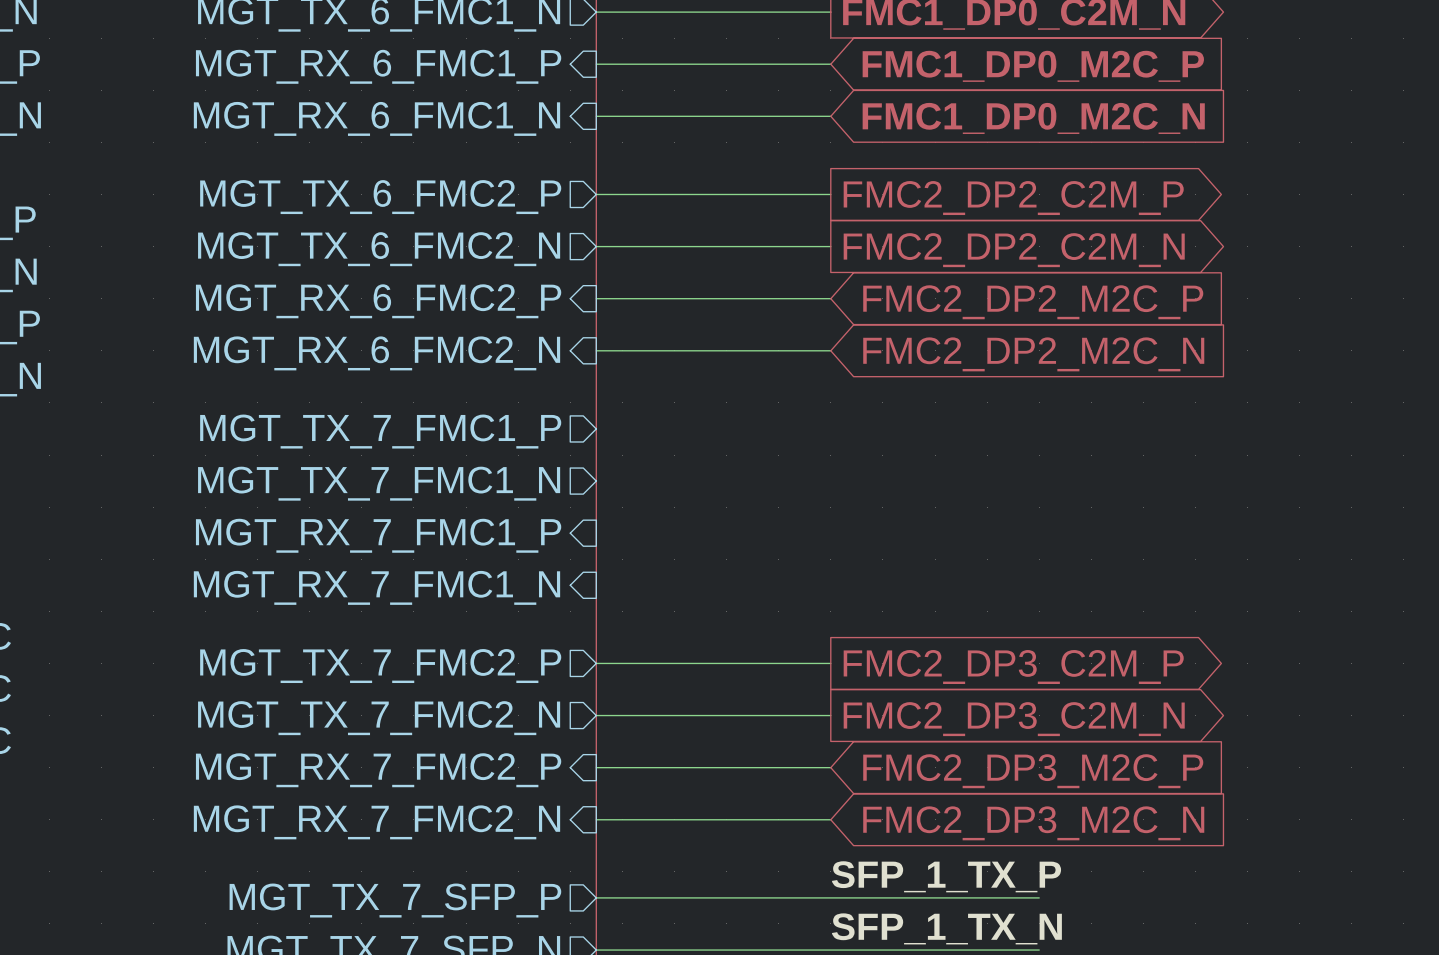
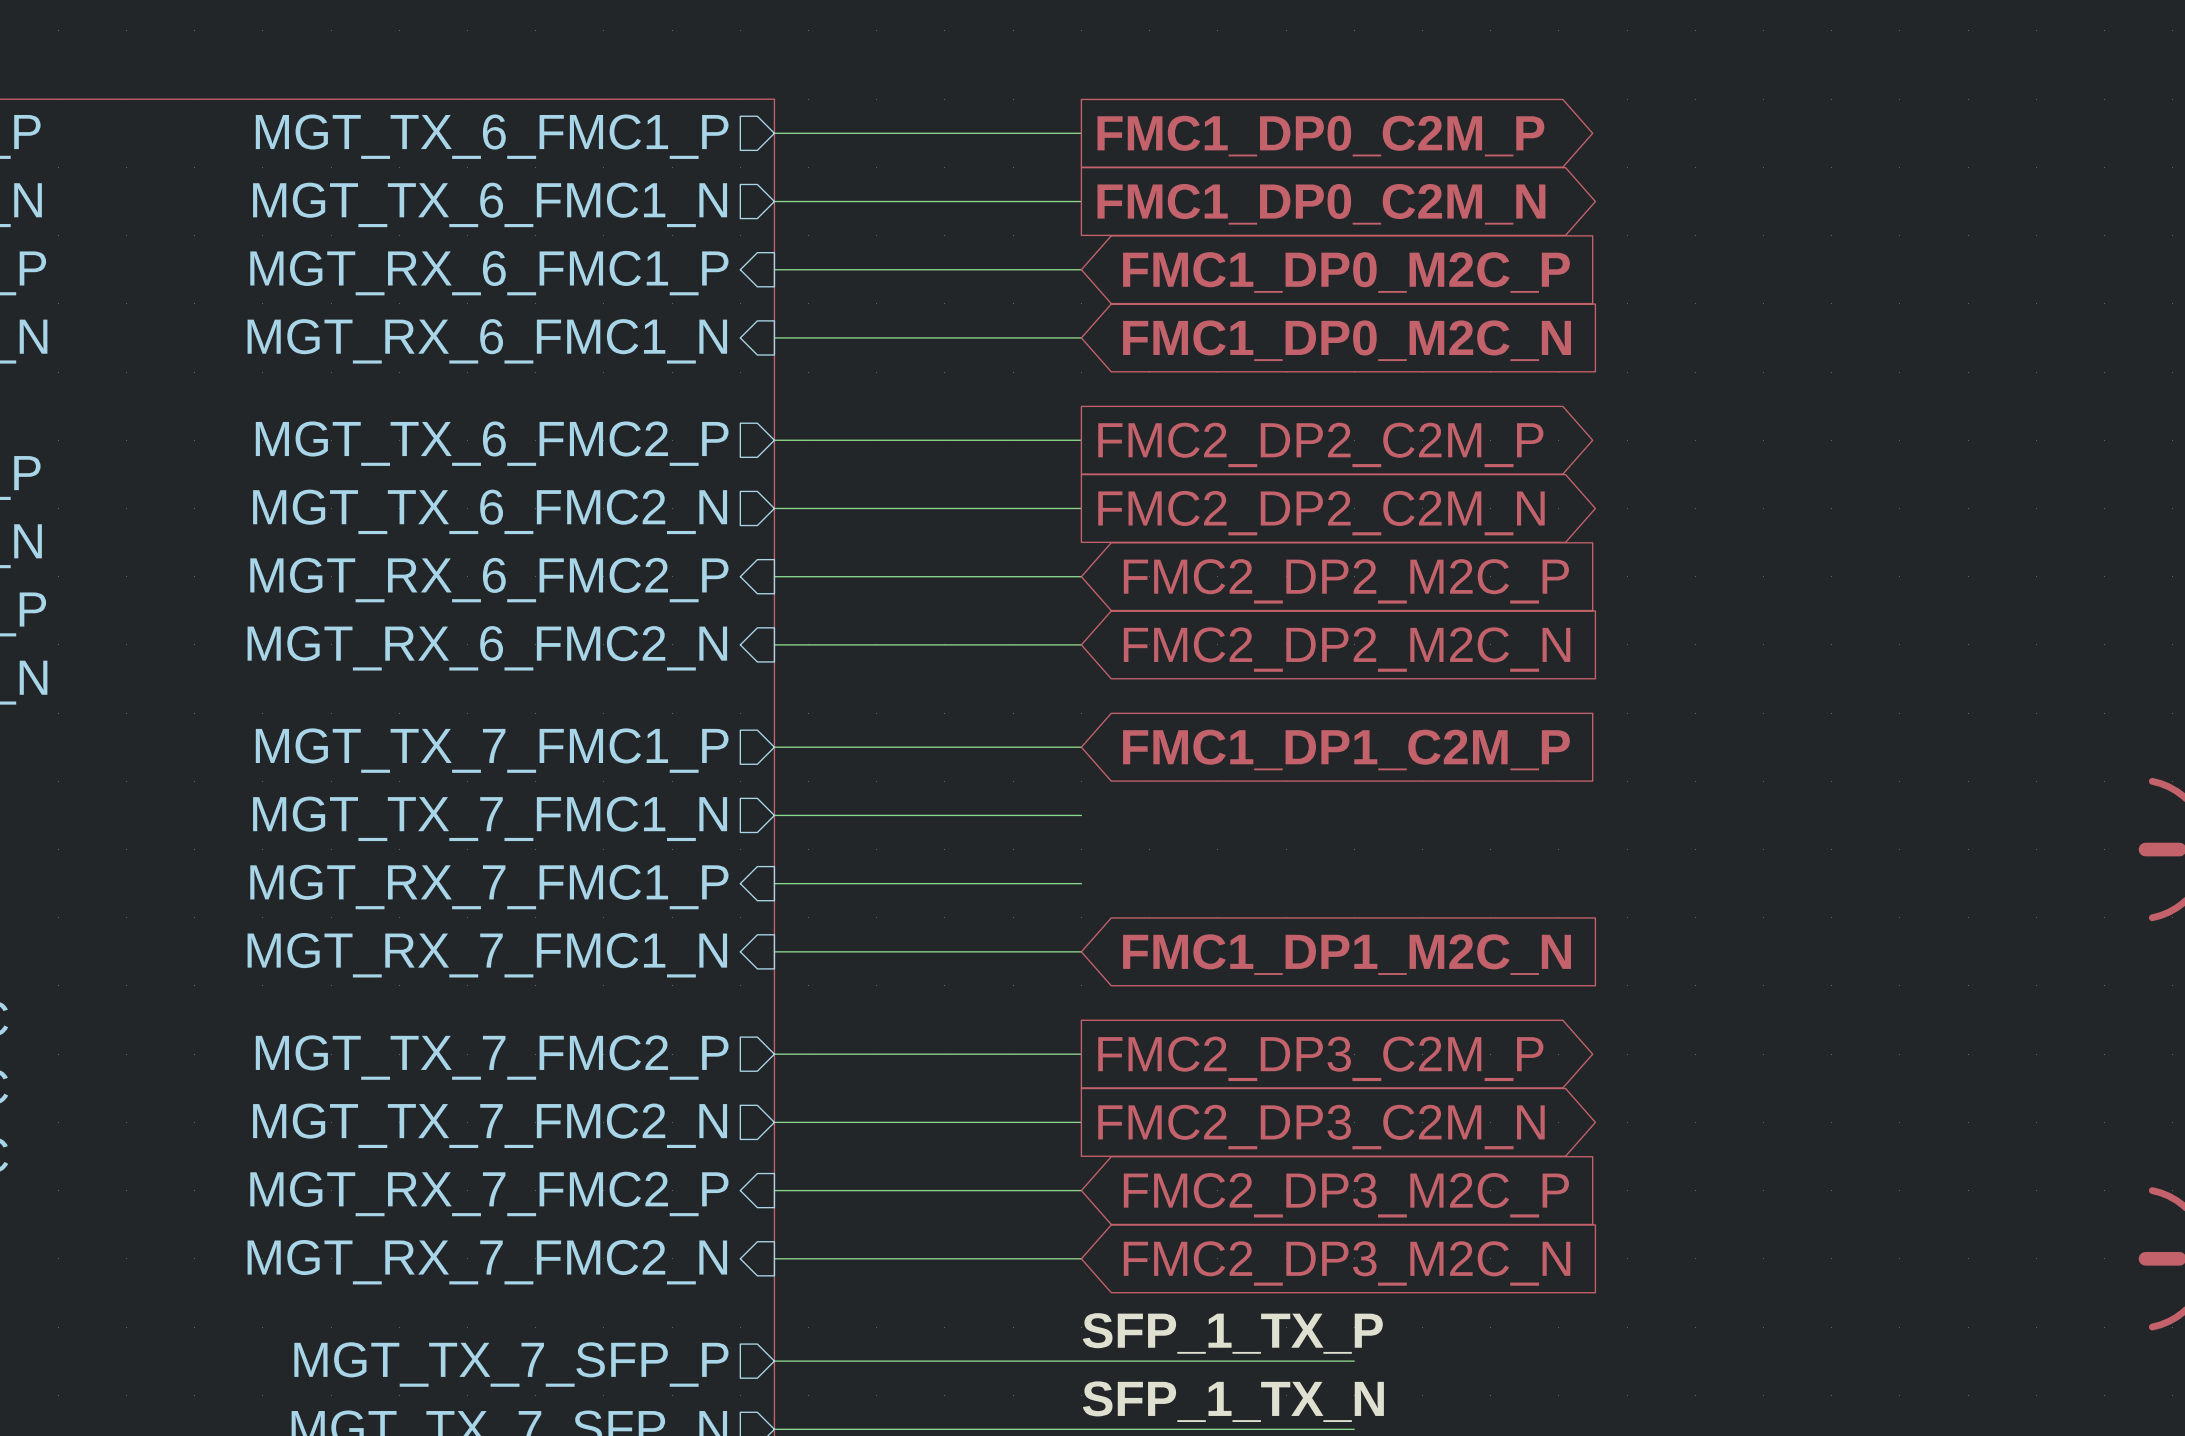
wire: none -> (774, 747) (1081, 747)
global label: none -> FMC1_DP1_C2M_P (1346, 749)
wire: none -> (774, 815) (1081, 815)
wire: none -> (774, 883) (1081, 883)
wire: none -> (774, 951) (1081, 951)
global label: none -> FMC1_DP1_M2C_N (1347, 954)

